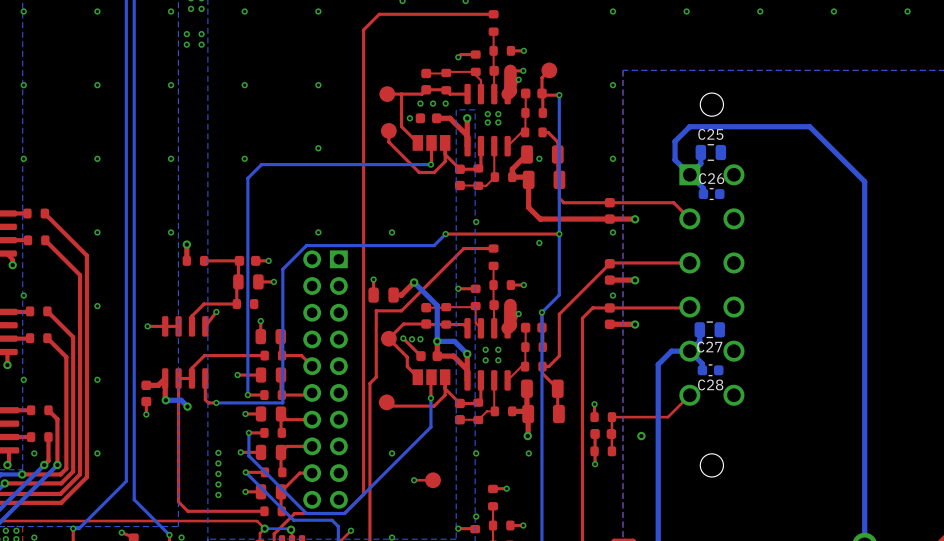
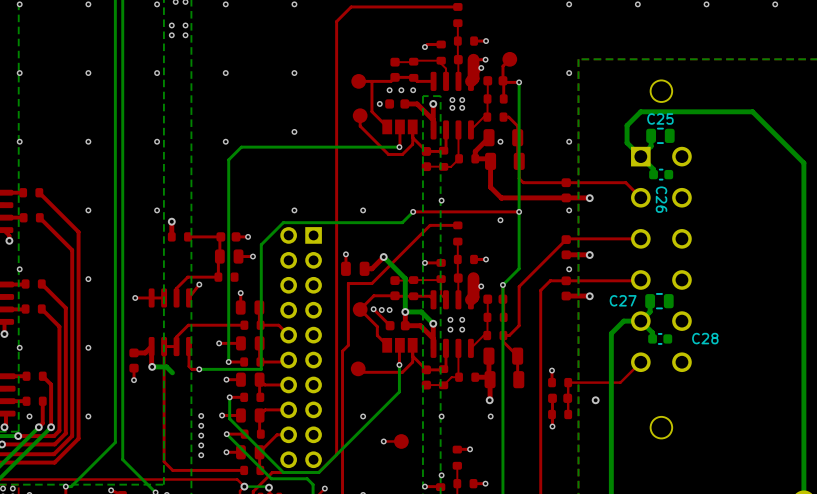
C26 name rotation: 0° (711, 178) -> 90° clockwise (661, 199)
C26 name position: C26 (711, 178) -> C26 (661, 199)
C27 name position: C27 (709, 347) -> C27 (623, 300)
C28 name position: C28 (710, 384) -> C28 (705, 338)
via: (187, 406) -> none

